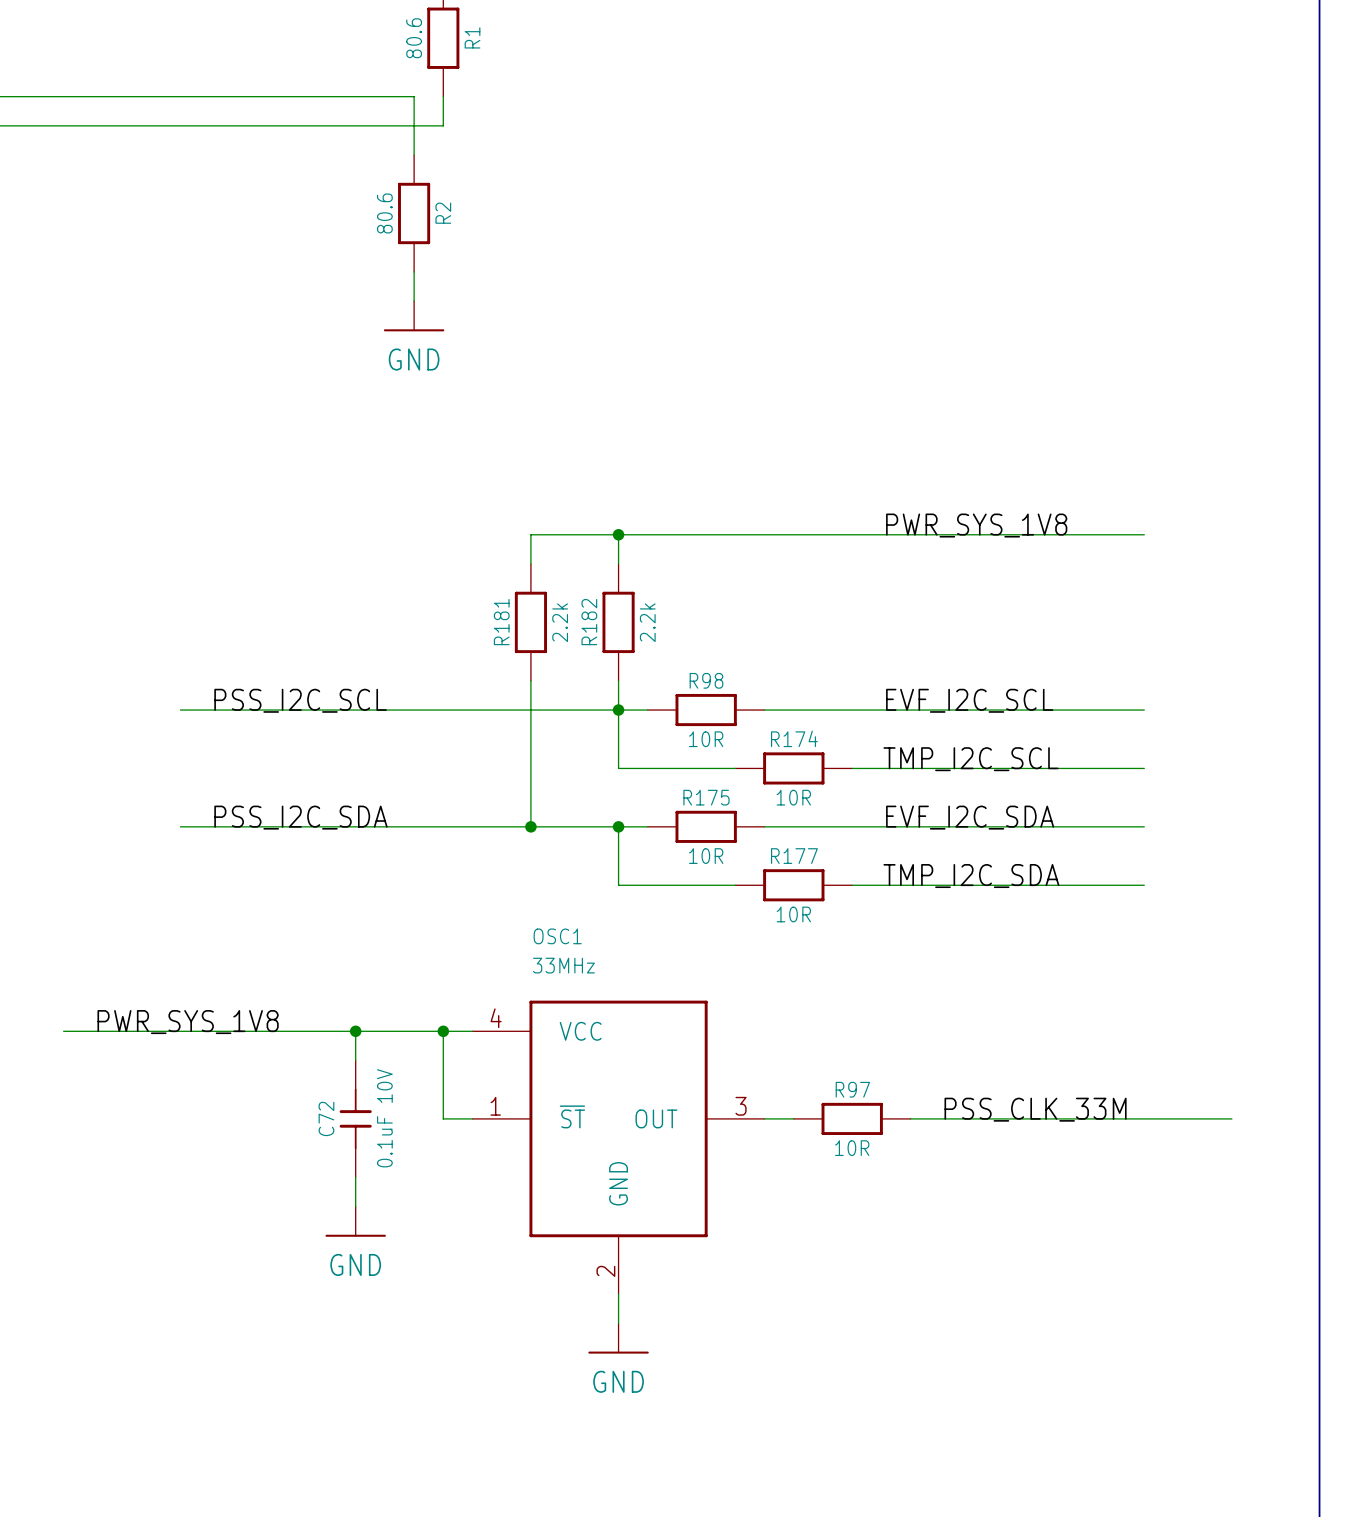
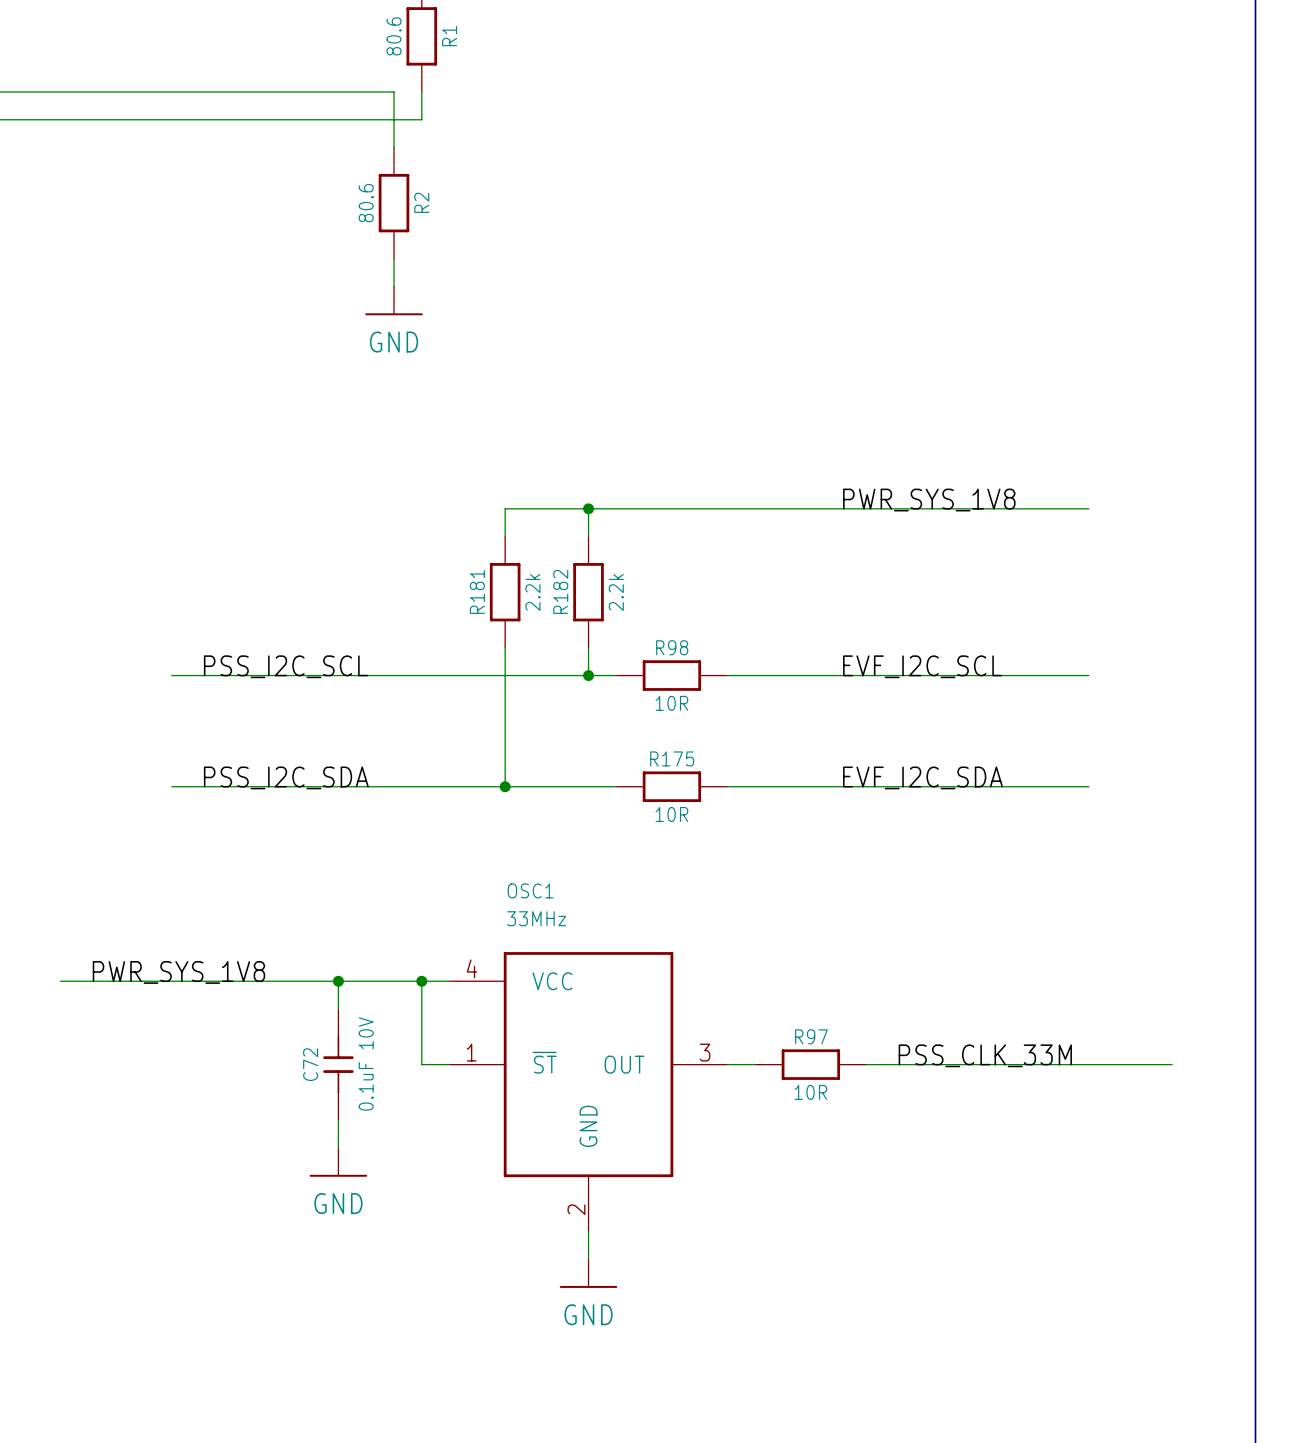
wire: (618, 710) (618, 768) (735, 768) -> none
label: TMP_I2C_SCL (971, 759) -> none
R174: 10R (793, 768) -> none
wire: (852, 768) (1144, 768) -> none
wire: (618, 826) (618, 885) (735, 885) -> none
junction: (618, 826) -> none
label: TMP_I2C_SDA (971, 876) -> none
R177: 10R (793, 885) -> none
wire: (852, 885) (1144, 885) -> none

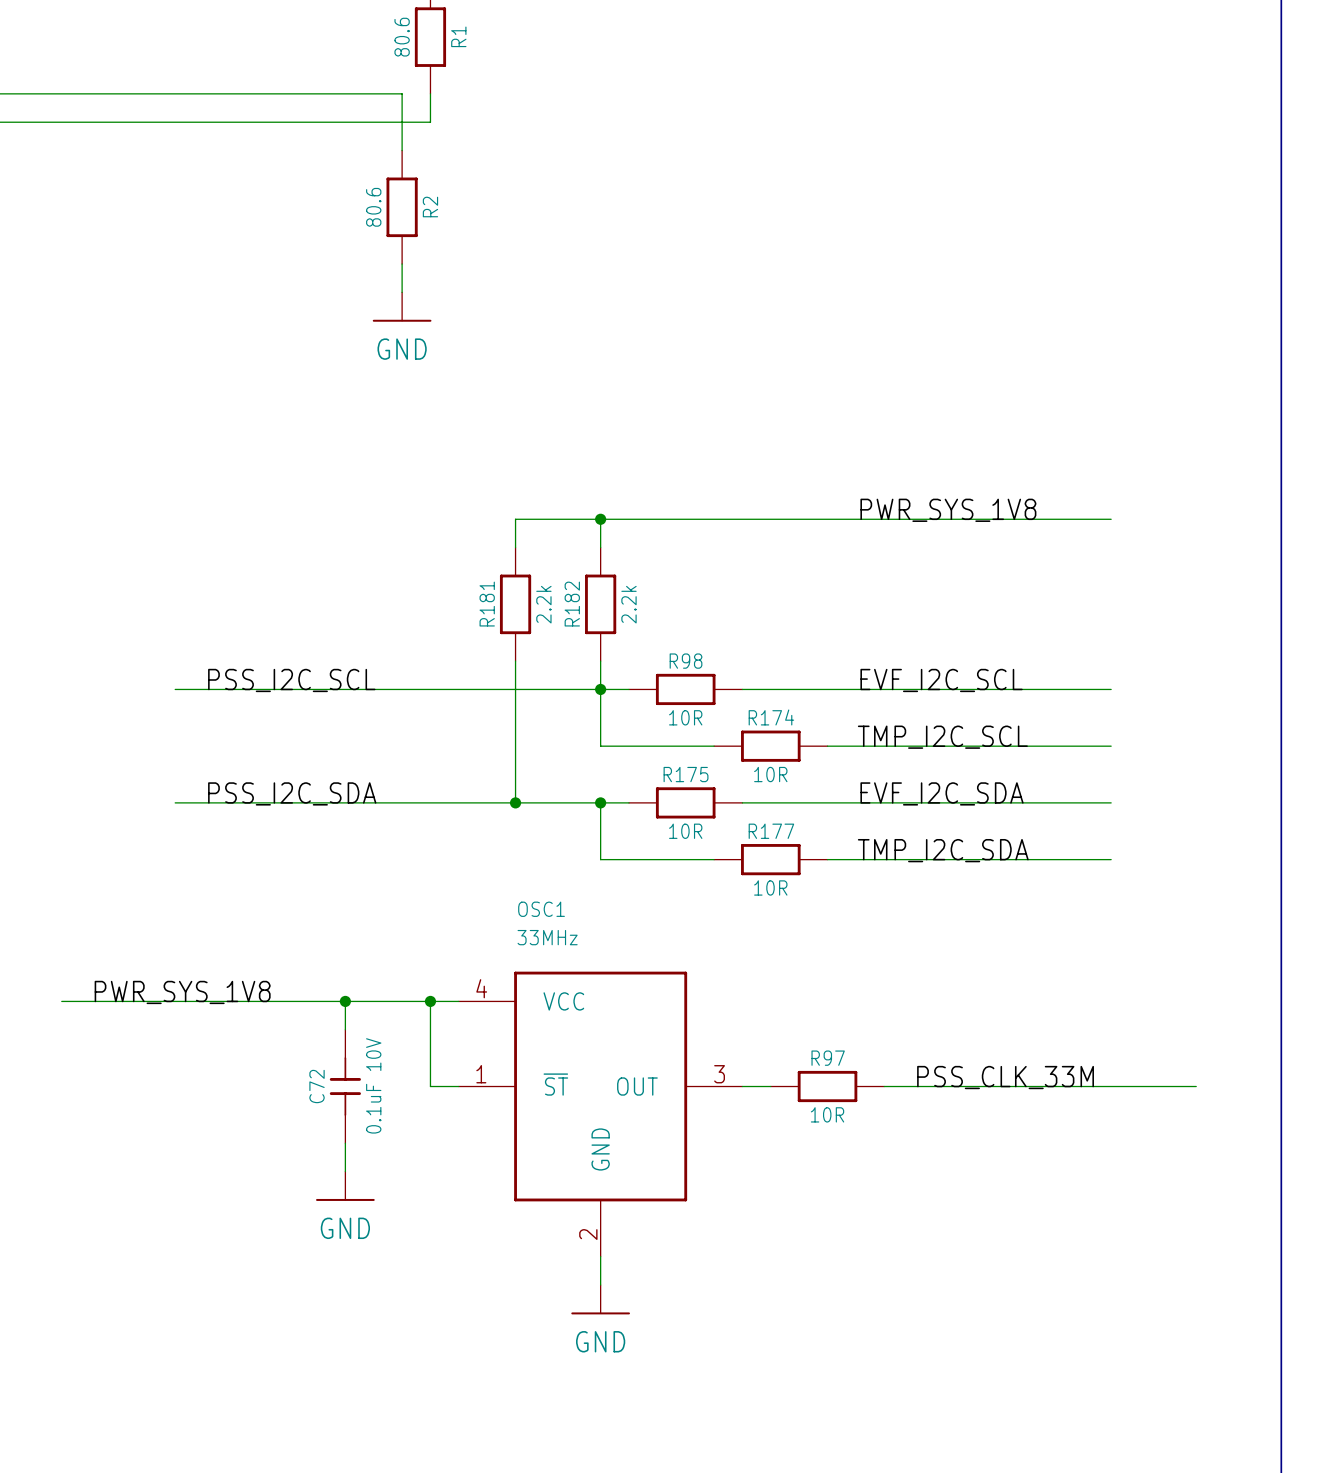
wire: none -> (600, 689) (600, 746) (714, 746)
label: none -> TMP_I2C_SCL (942, 737)
R174: none -> 10R (770, 746)
wire: none -> (827, 746) (1111, 746)
wire: none -> (600, 802) (600, 859) (714, 859)
junction: none -> (600, 802)
label: none -> TMP_I2C_SDA (943, 850)
R177: none -> 10R (770, 859)
wire: none -> (827, 859) (1111, 859)

